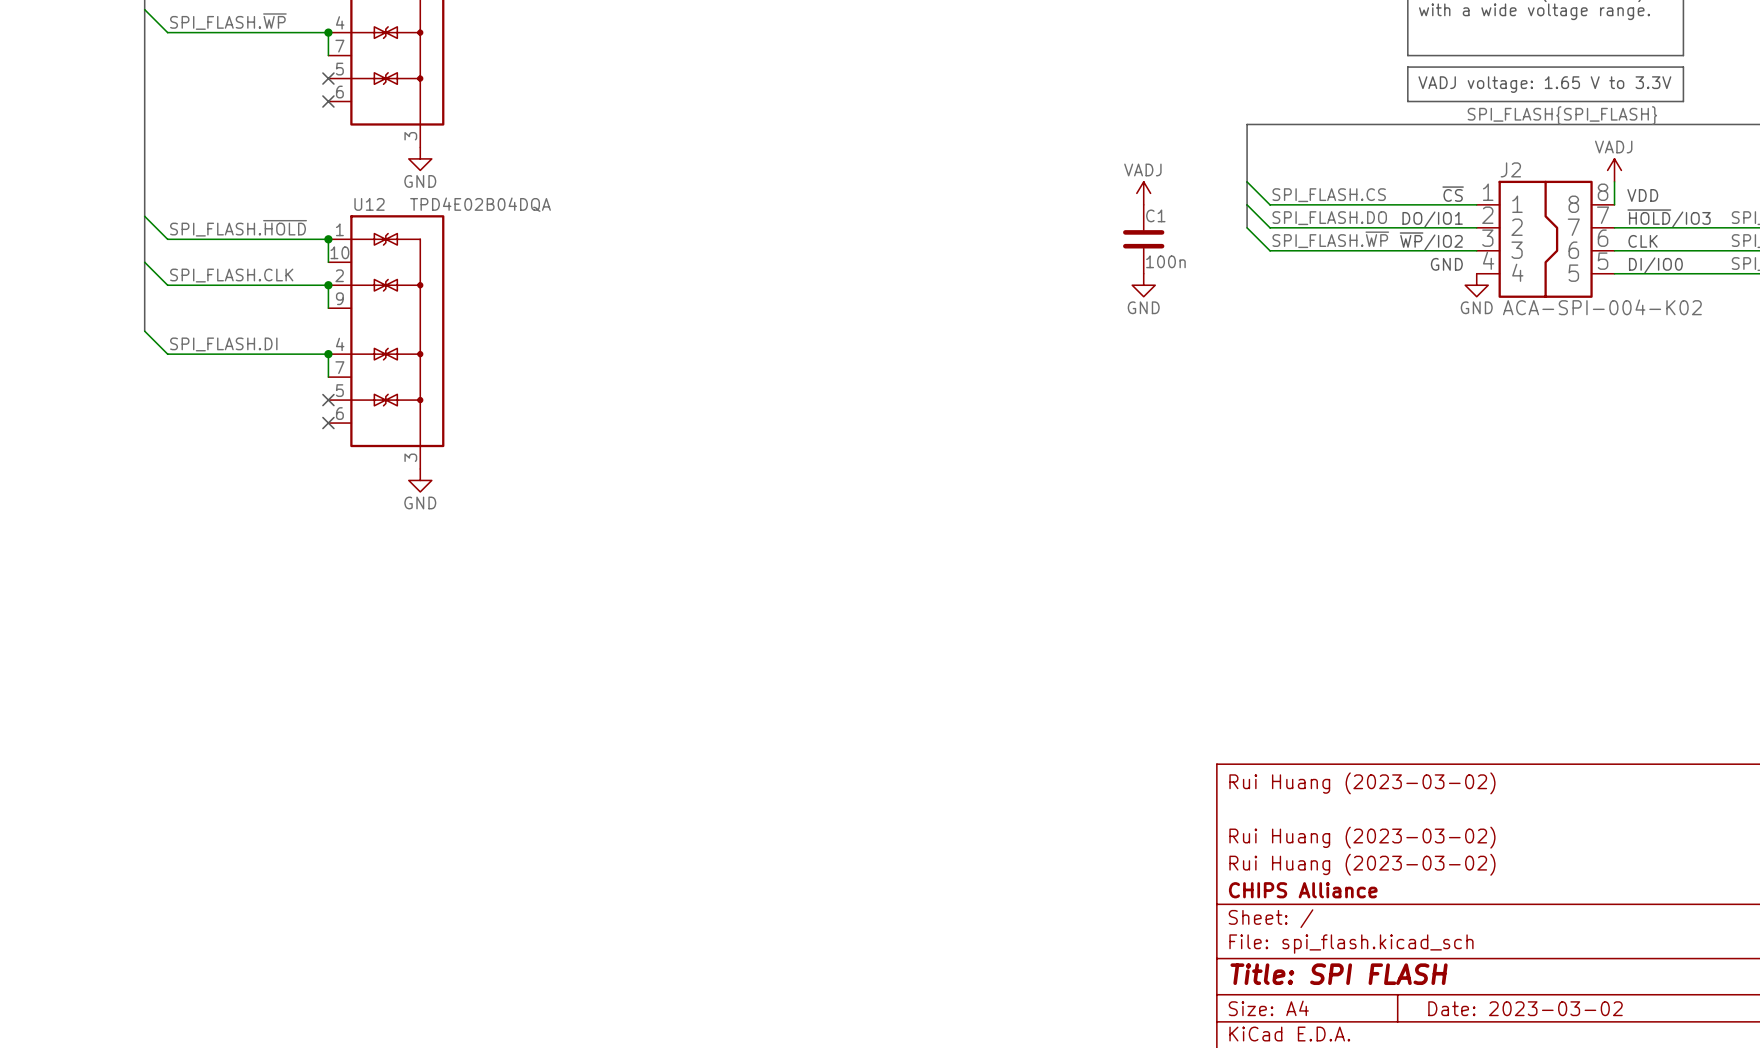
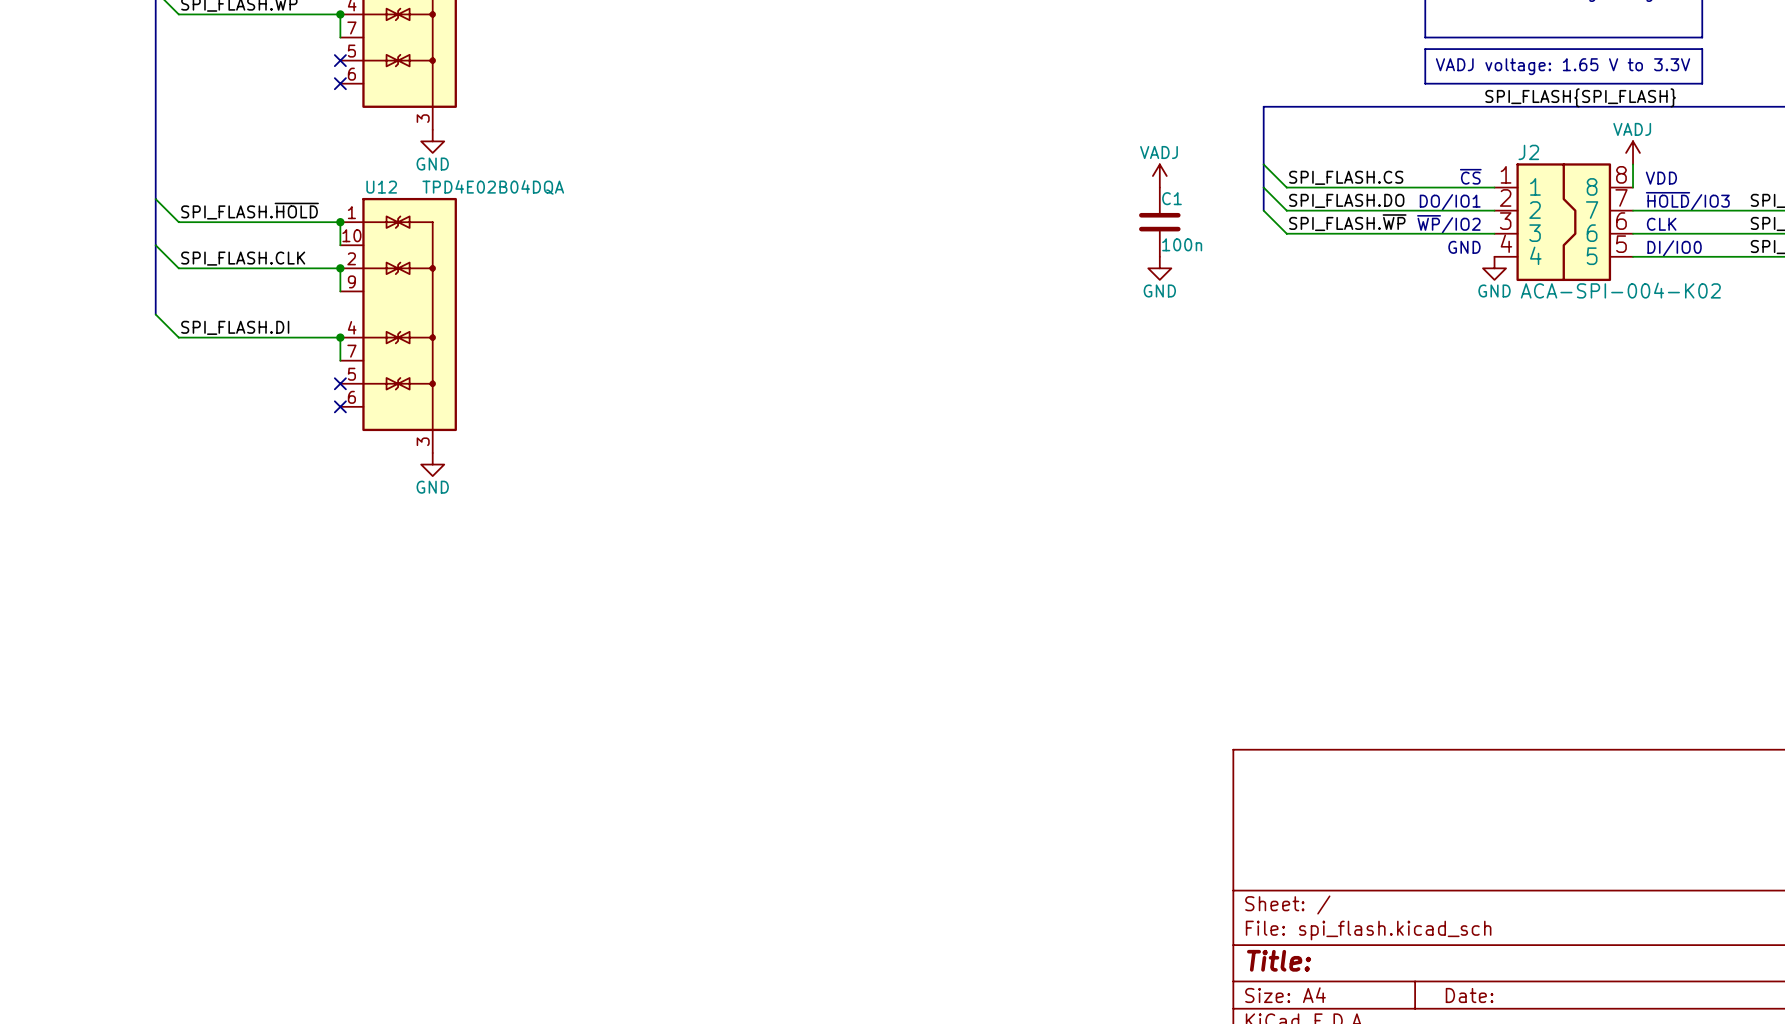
title block: Rui Huang (2023-03-02) (1362, 783) -> none
title block: Rui Huang (2023-03-02) (1362, 837) -> none
title block: Rui Huang (2023-03-02) (1362, 864) -> none
title block: CHIPS Alliance (1303, 890) -> none
title block: Title: SPI FLASH (1339, 974) -> Title: (1279, 960)
title block: Date: 2023-03-02 (1525, 1008) -> Date: (1469, 995)

